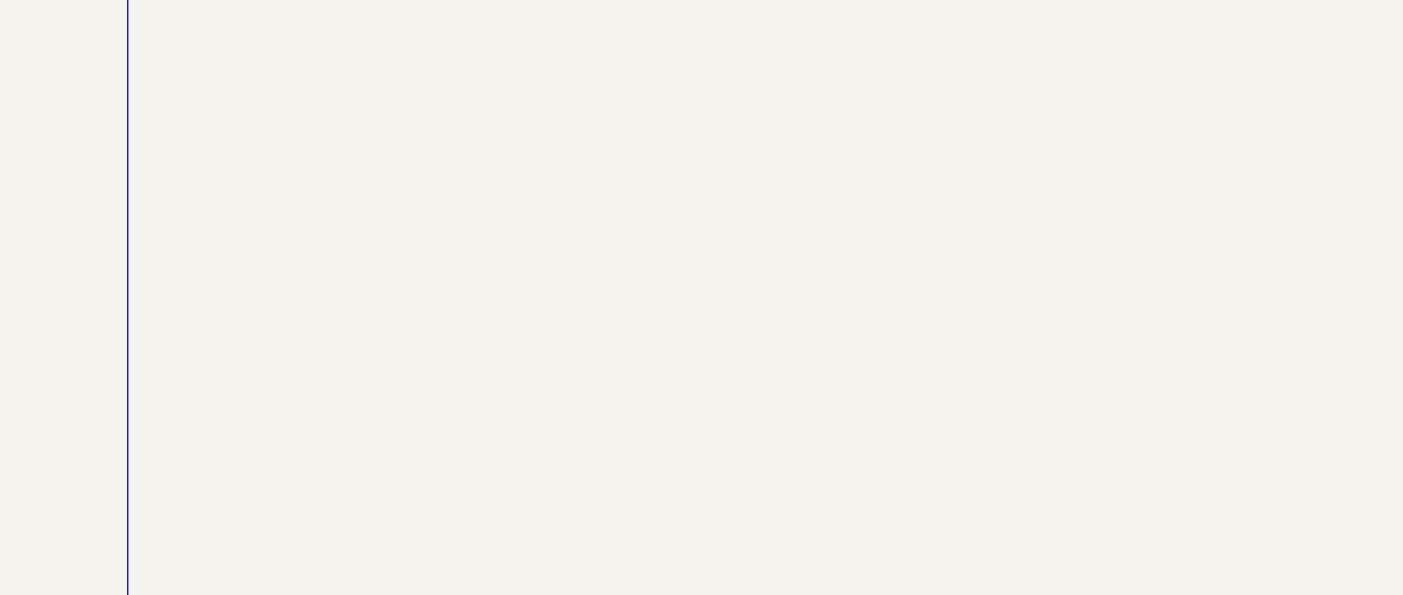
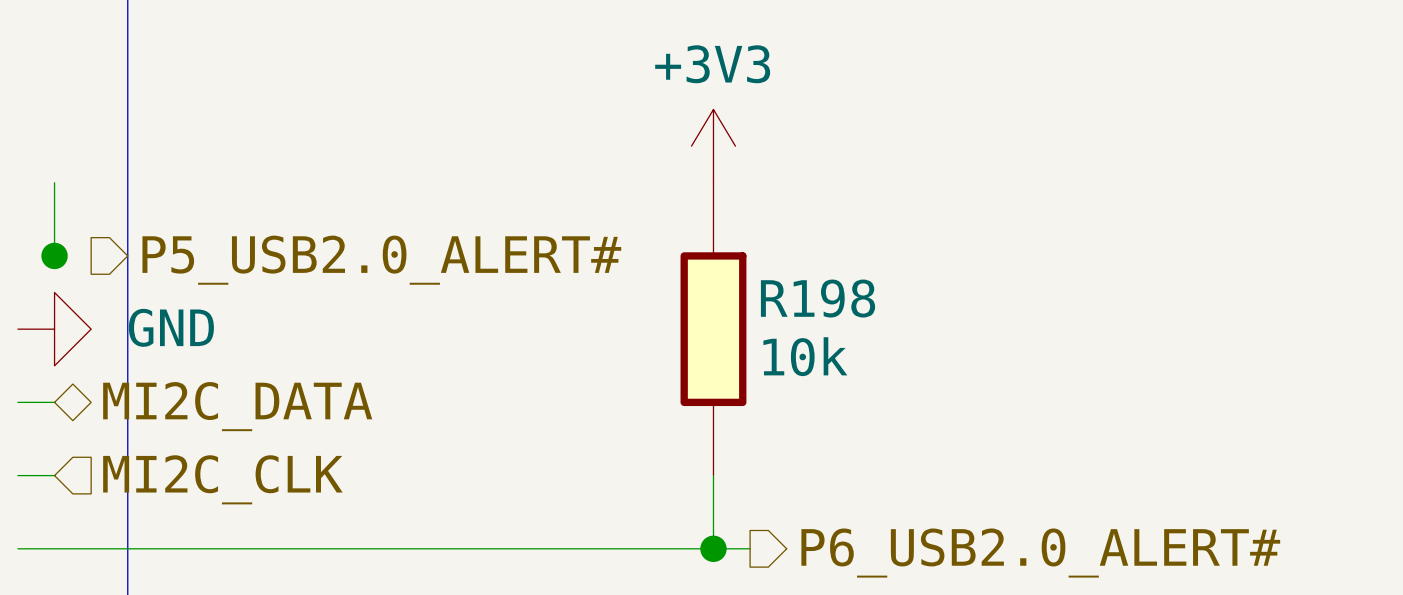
power symbol: none -> +3V3 (713, 146)
wire: none -> (54, 182) (54, 255)
junction: none -> (54, 255)
hierarchical label: none -> P5_USB2.0_ALERT# (381, 260)
power symbol: none -> GND (54, 329)
R198: none -> 10k (713, 329)
wire: none -> (17, 402) (54, 402)
hierarchical label: none -> MI2C_DATA (237, 406)
wire: none -> (17, 475) (54, 475)
wire: none -> (713, 475) (713, 548)
hierarchical label: none -> MI2C_CLK (222, 479)
wire: none -> (17, 548) (750, 548)
junction: none -> (713, 548)
hierarchical label: none -> P6_USB2.0_ALERT# (1040, 553)

